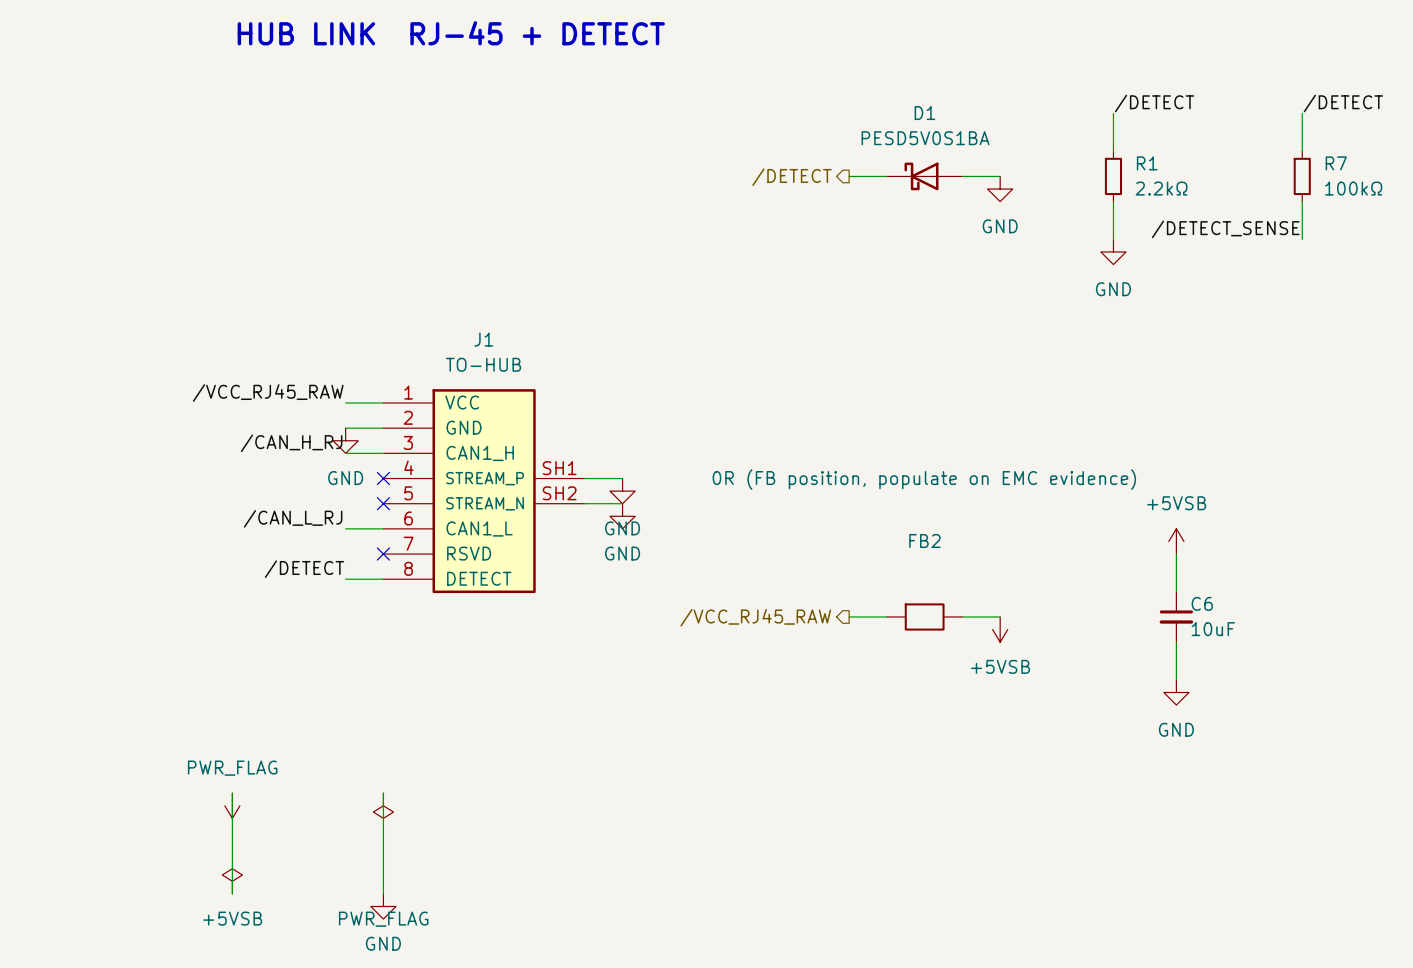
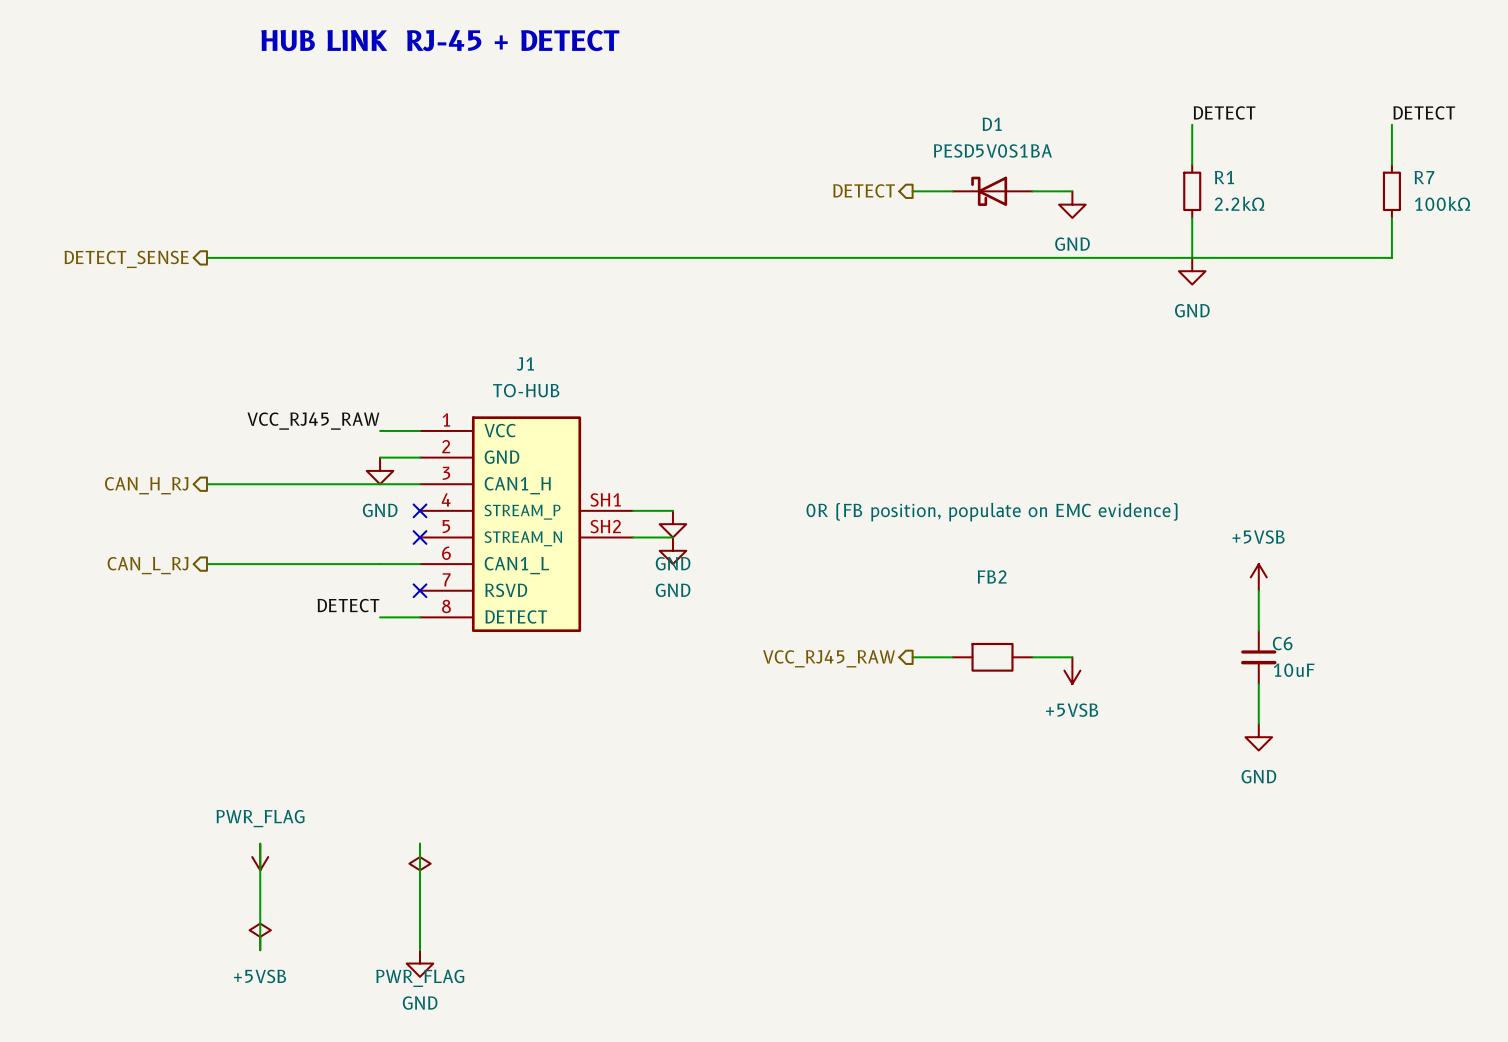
label: /DETECT (1154, 103) -> DETECT (1224, 112)
label: /DETECT (1343, 103) -> DETECT (1424, 112)
hierarchical label: /DETECT (791, 177) -> DETECT (864, 190)
label: /DETECT_SENSE (1225, 229) -> none
hierarchical label: none -> DETECT_SENSE (126, 259)
wire: none -> (206, 257) (1391, 257)
label: /VCC_RJ45_RAW (268, 392) -> VCC_RJ45_RAW (313, 421)
label: /CAN_H_RJ (291, 443) -> none
hierarchical label: none -> CAN_H_RJ (146, 485)
wire: none -> (206, 484) (380, 484)
label: /CAN_L_RJ (293, 518) -> none
wire: none -> (206, 564) (380, 564)
hierarchical label: none -> CAN_L_RJ (147, 565)
label: /DETECT (304, 569) -> DETECT (348, 605)
hierarchical label: /VCC_RJ45_RAW (755, 617) -> VCC_RJ45_RAW (829, 658)

